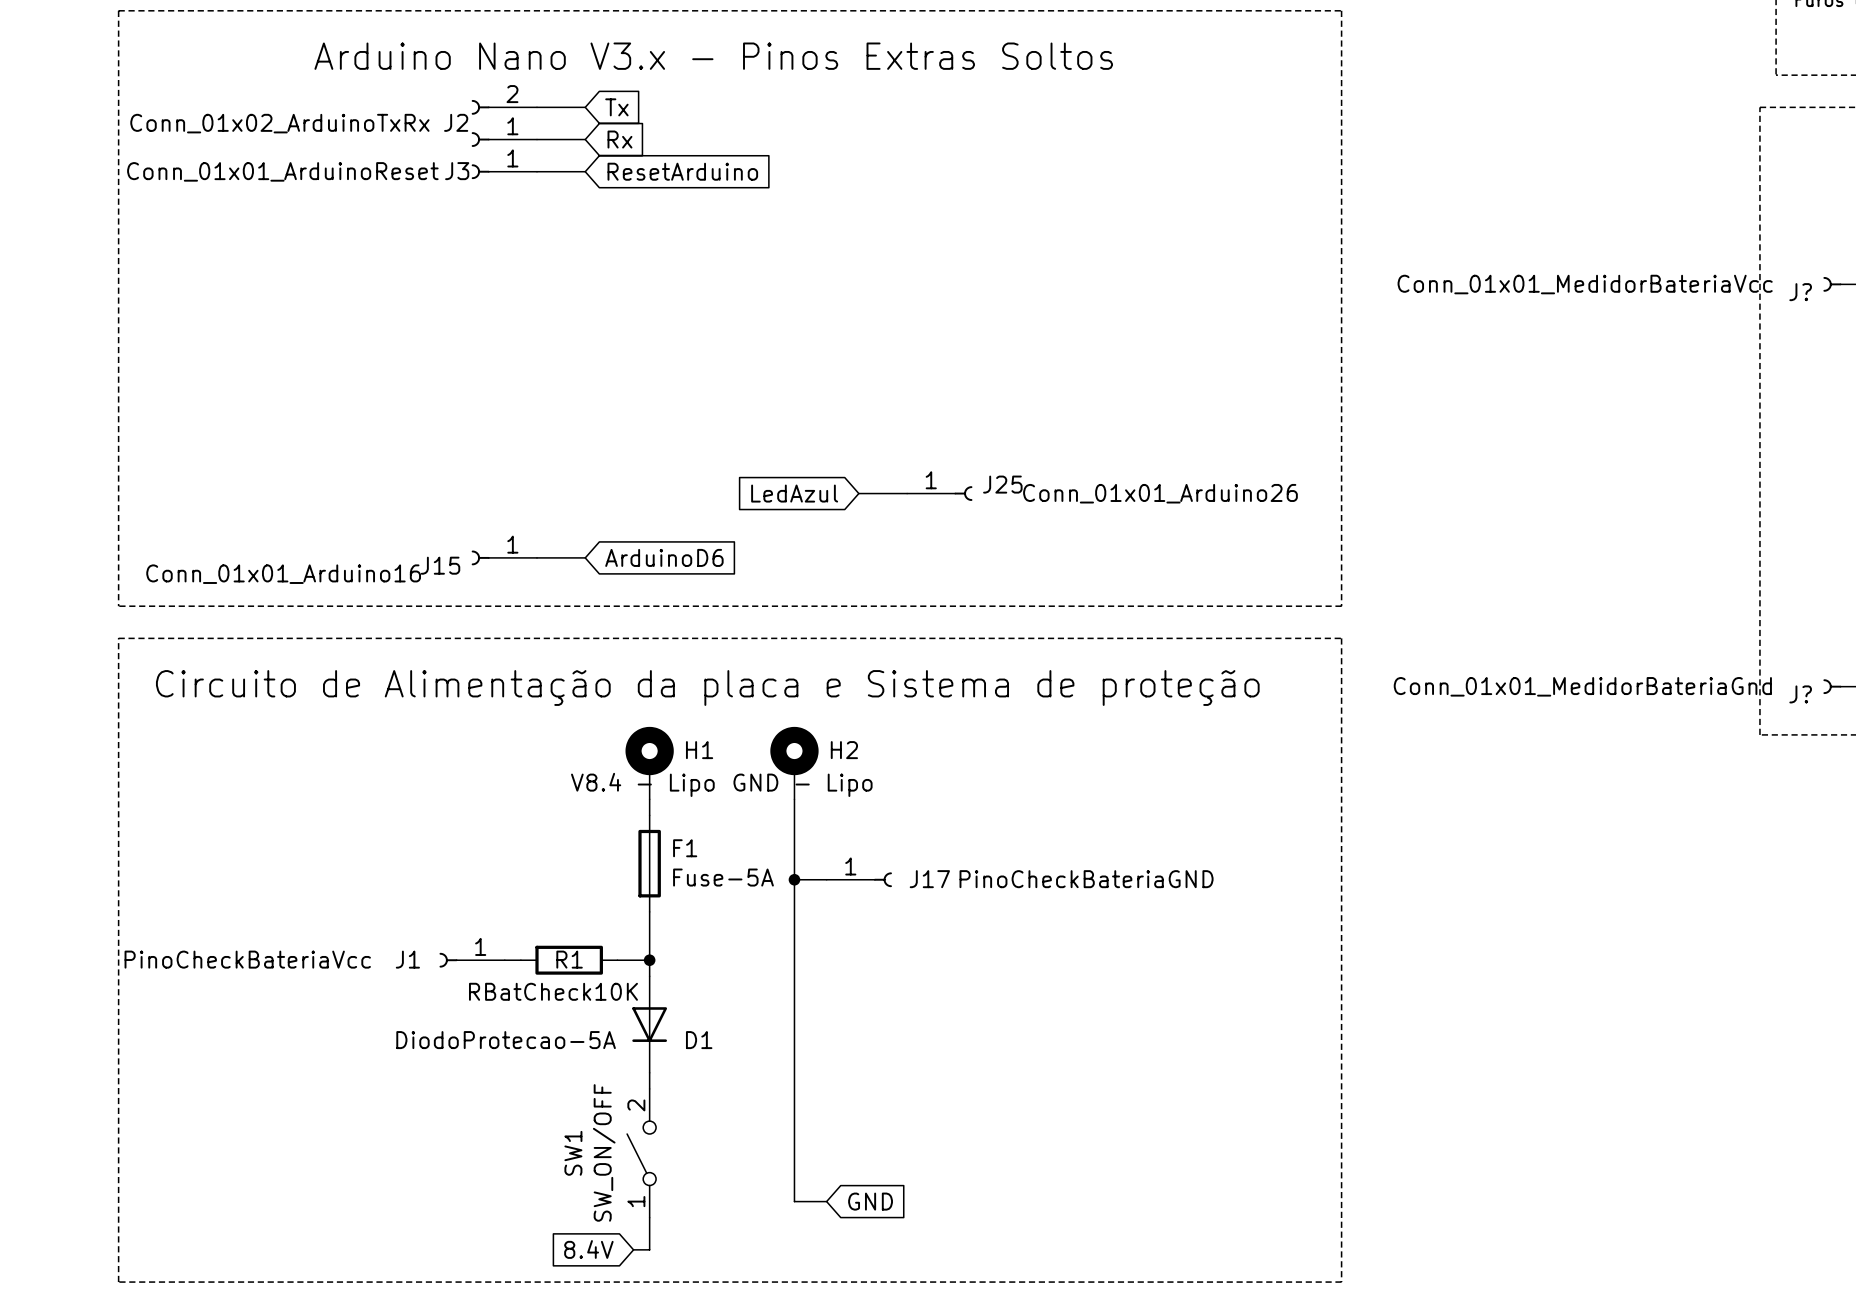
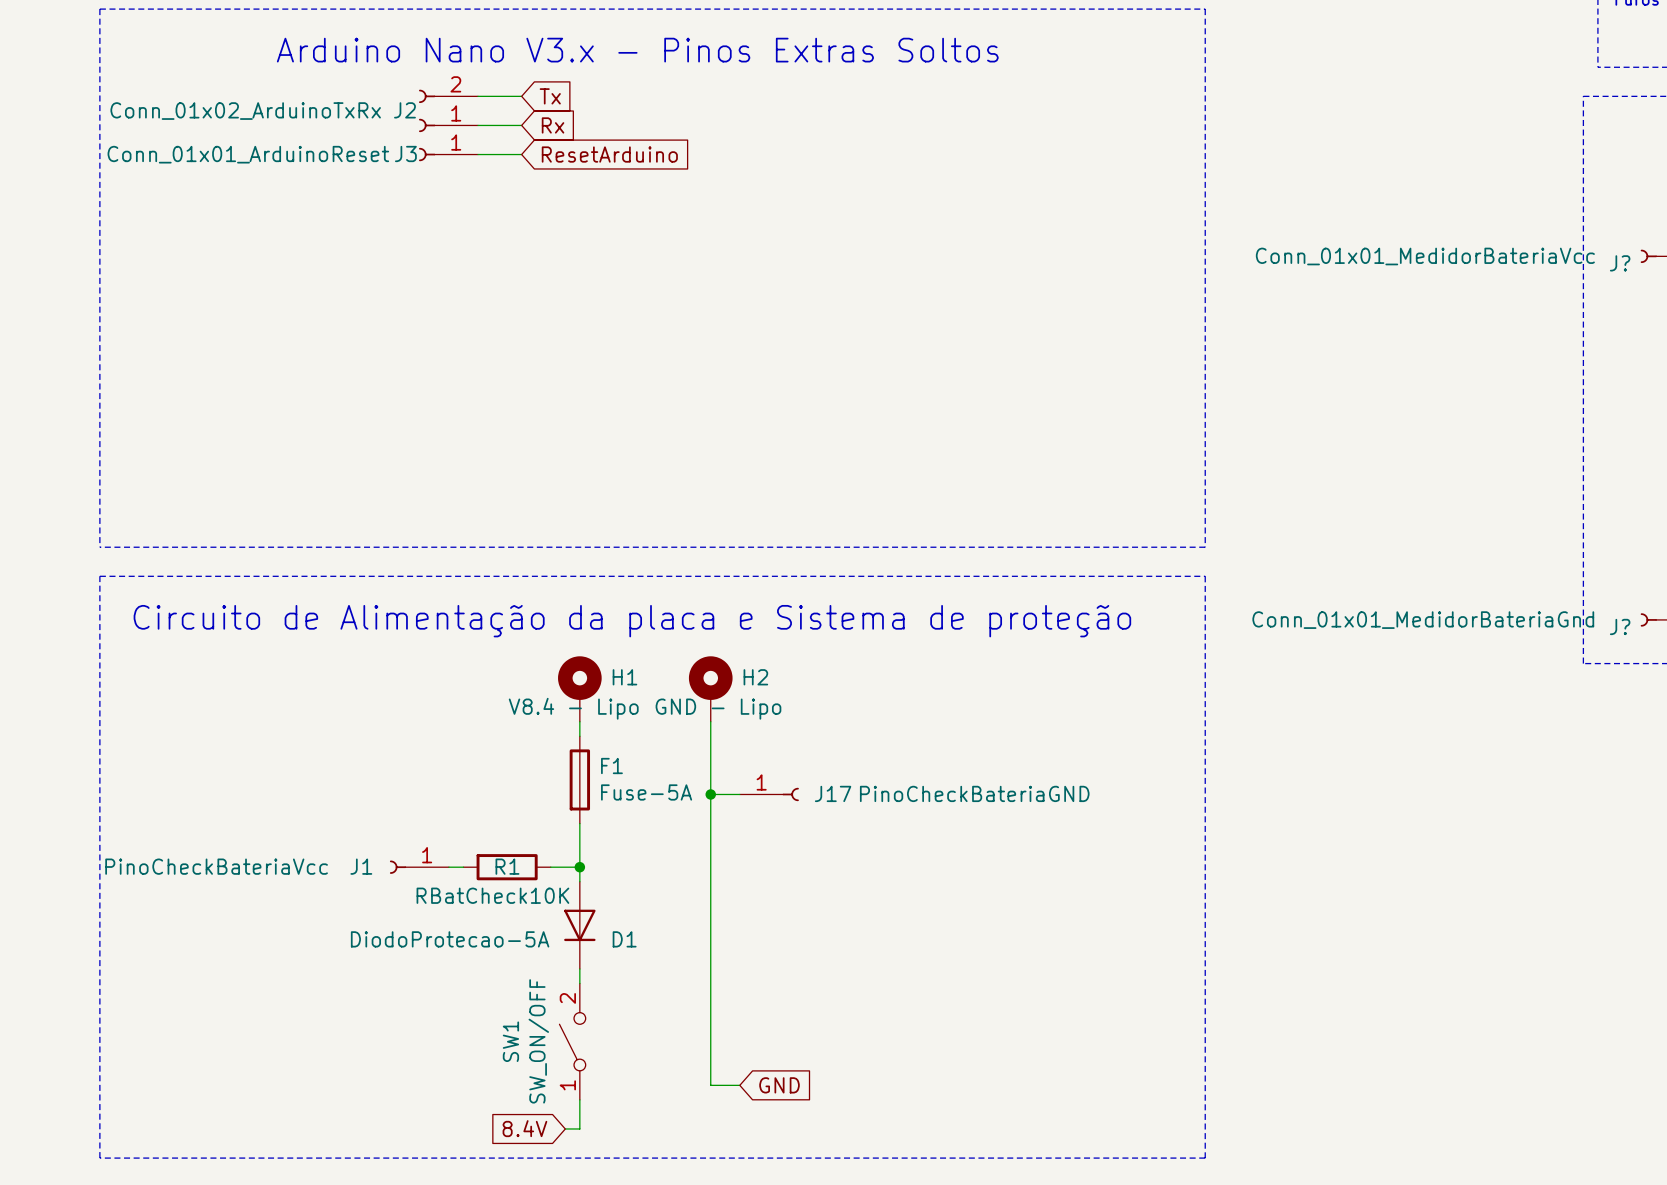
global label: LedAzul (794, 493) -> none
wire: (858, 493) (907, 493) -> none
J25: Conn_01x01_Arduino26 (939, 493) -> none
J15: Conn_01x01_Arduino16 (504, 557) -> none
wire: (537, 557) (585, 557) -> none
global label: ArduinoD6 (664, 557) -> none

